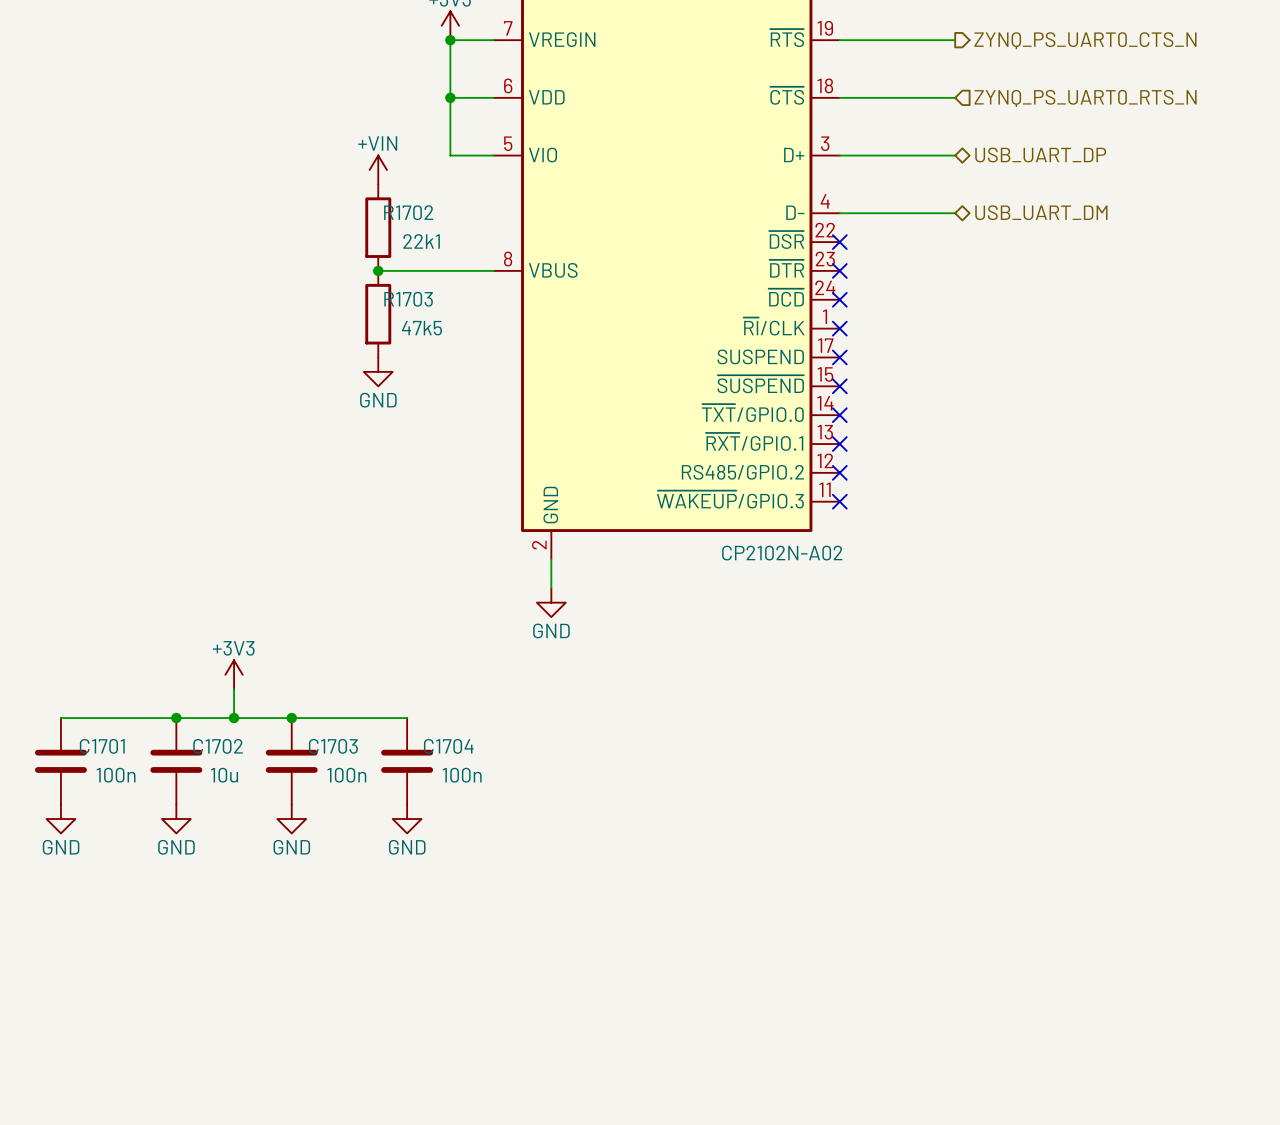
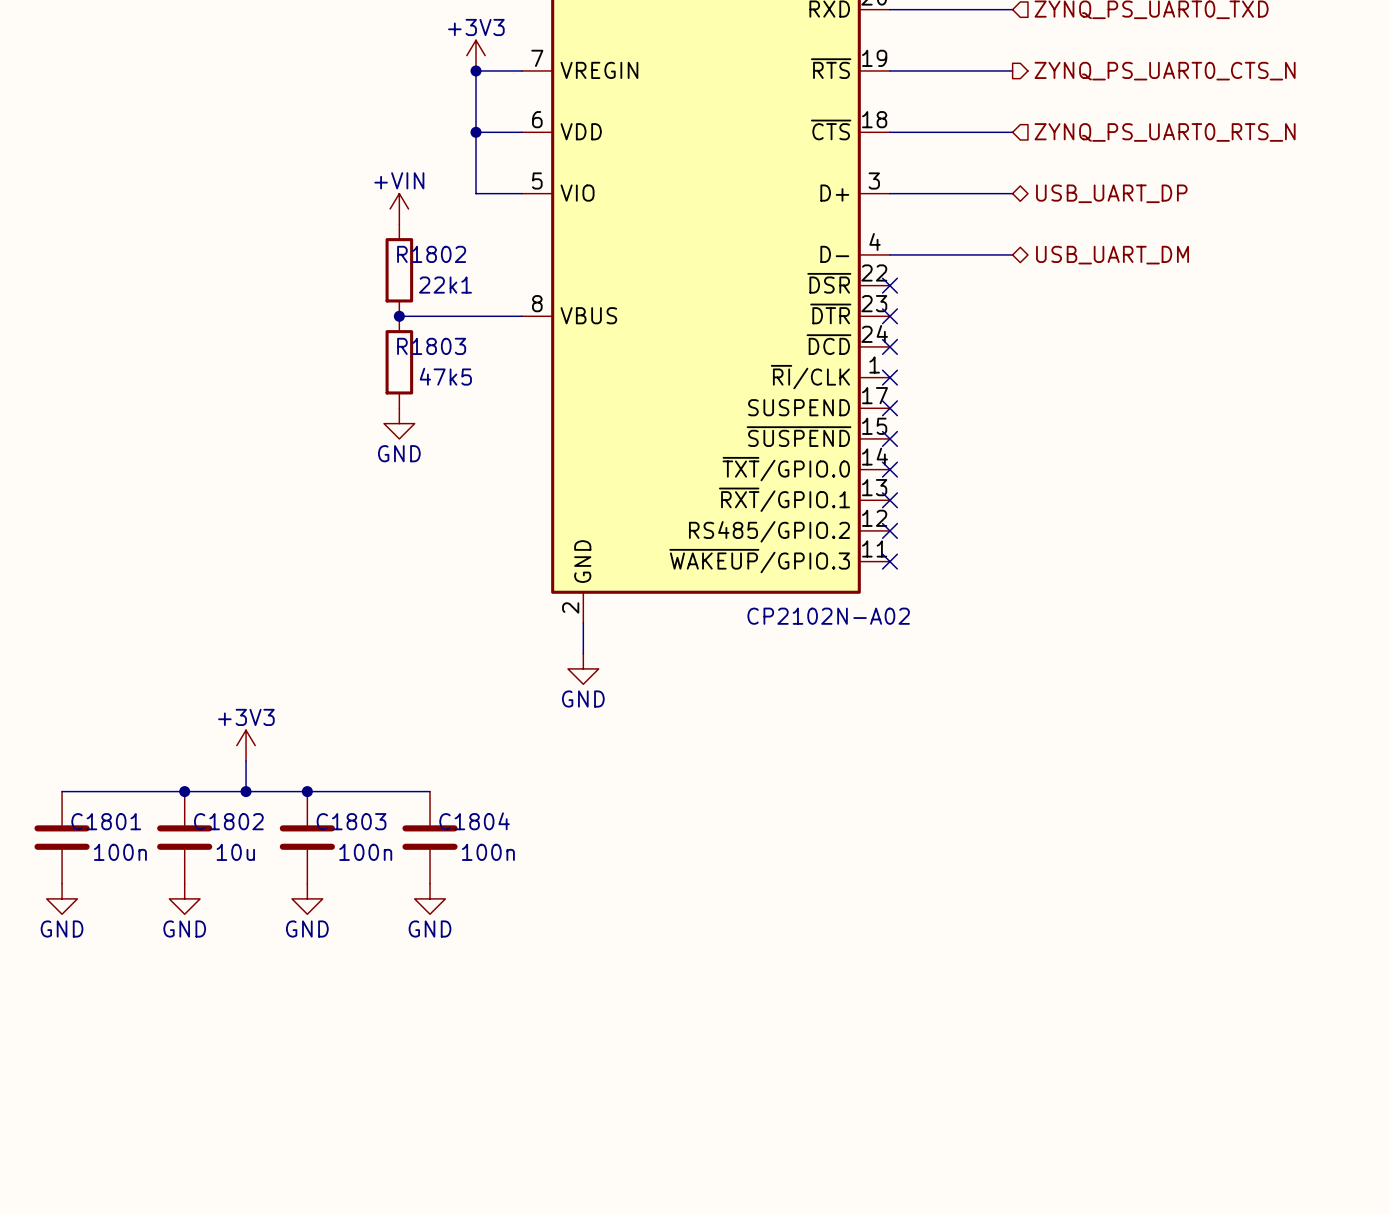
R1702 name: R1702 (408, 212) -> R1802 (431, 254)
R1703 name: R1703 (408, 299) -> R1803 (431, 346)
C1701 name: C1701 (102, 746) -> C1801 (106, 821)
C1702 name: C1702 (218, 746) -> C1802 (228, 821)
C1703 name: C1703 (333, 746) -> C1803 (351, 821)
C1704 name: C1704 (448, 746) -> C1804 (474, 821)

